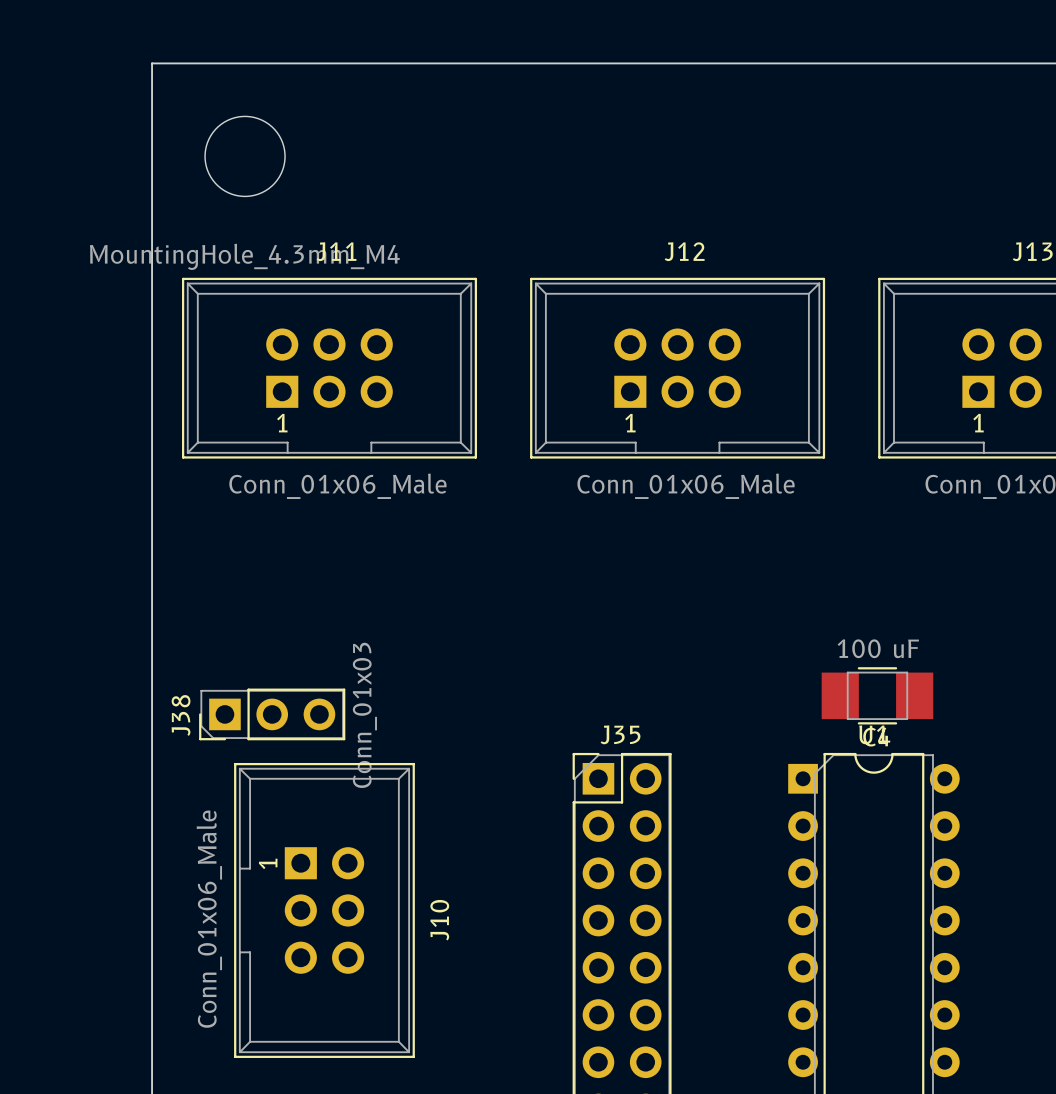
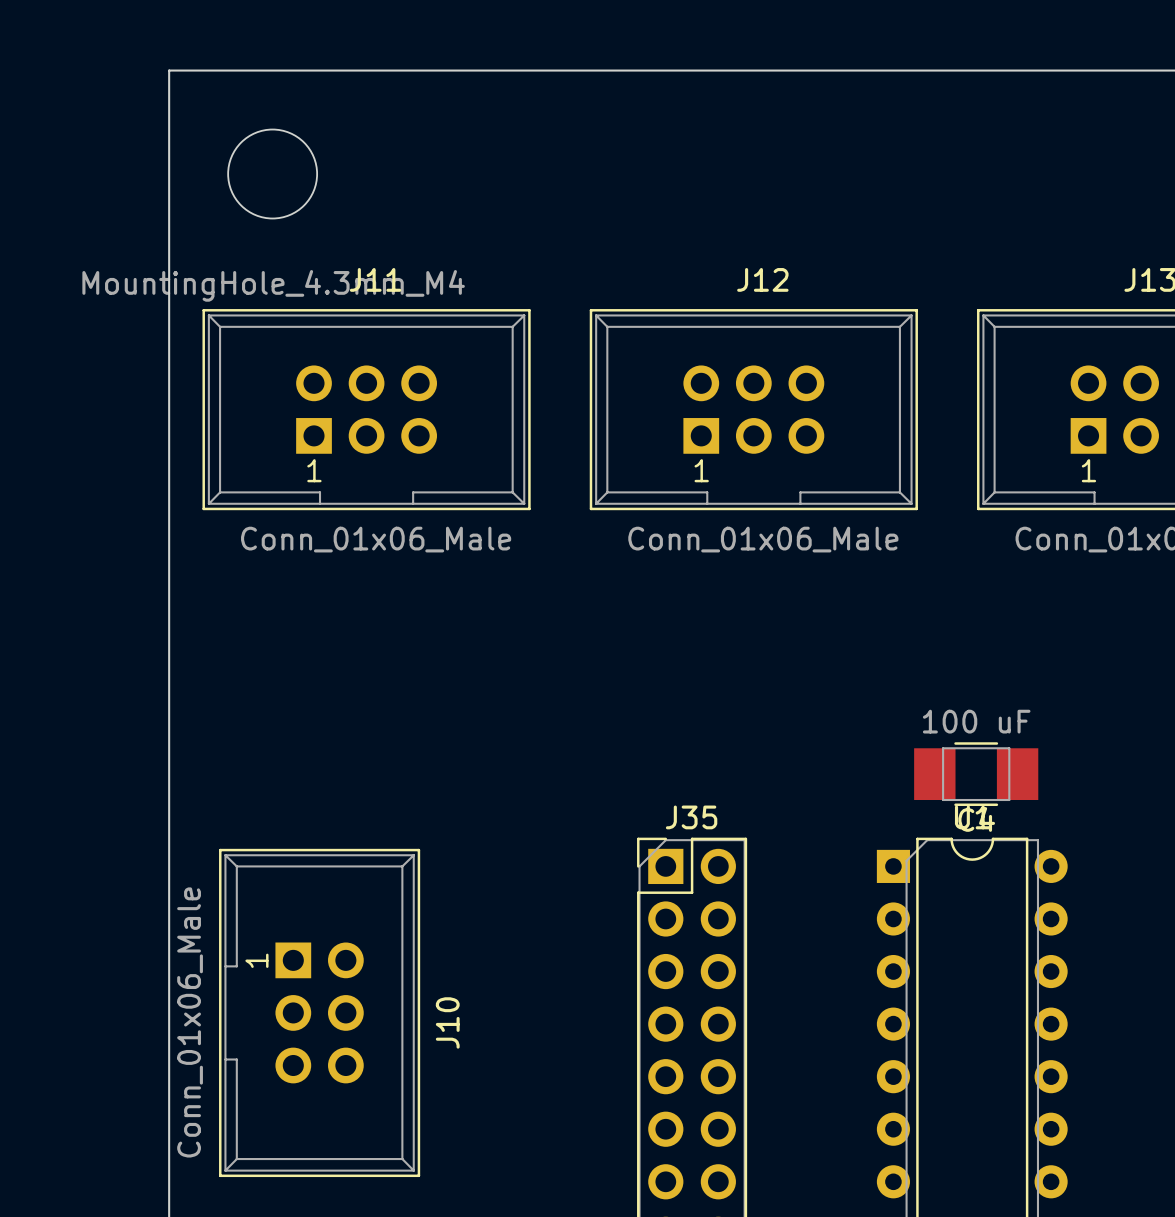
J38: Conn_01x03 (272, 714) -> none
J10 position: (324, 910) -> (319, 1012)

